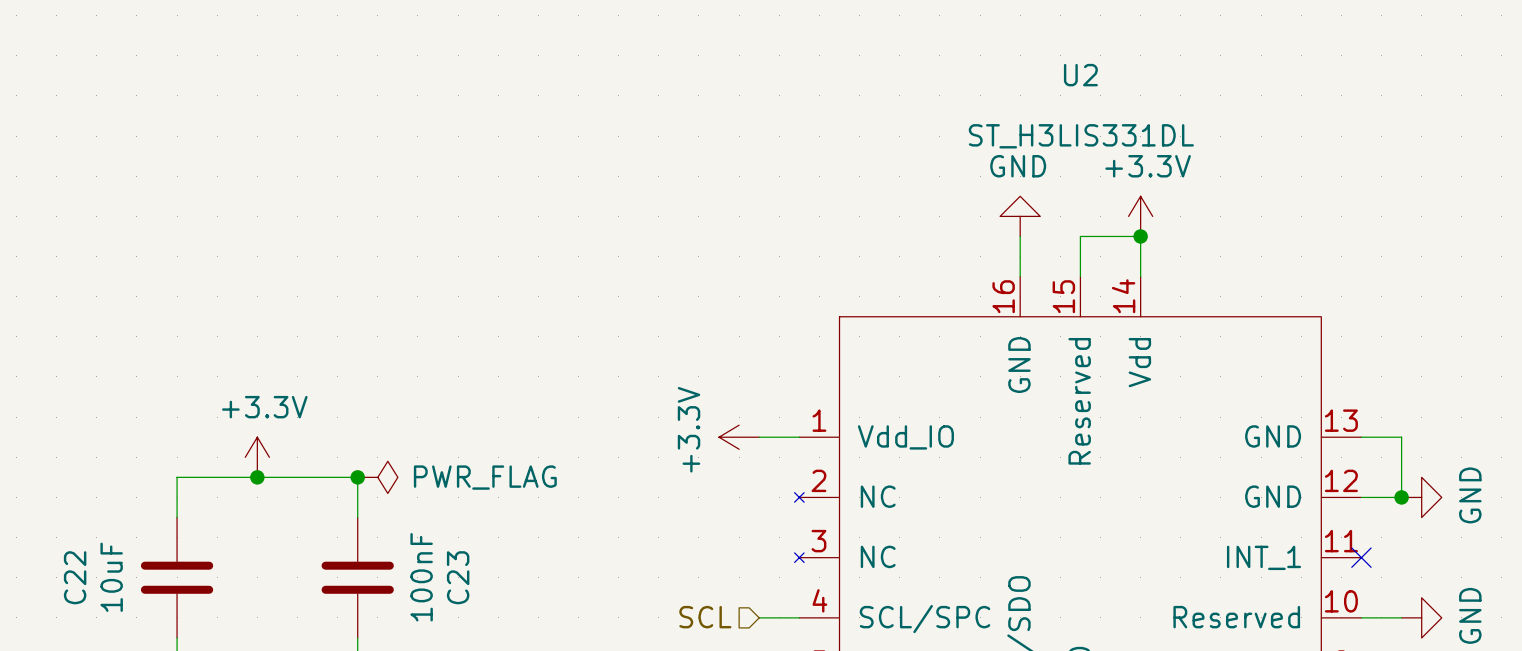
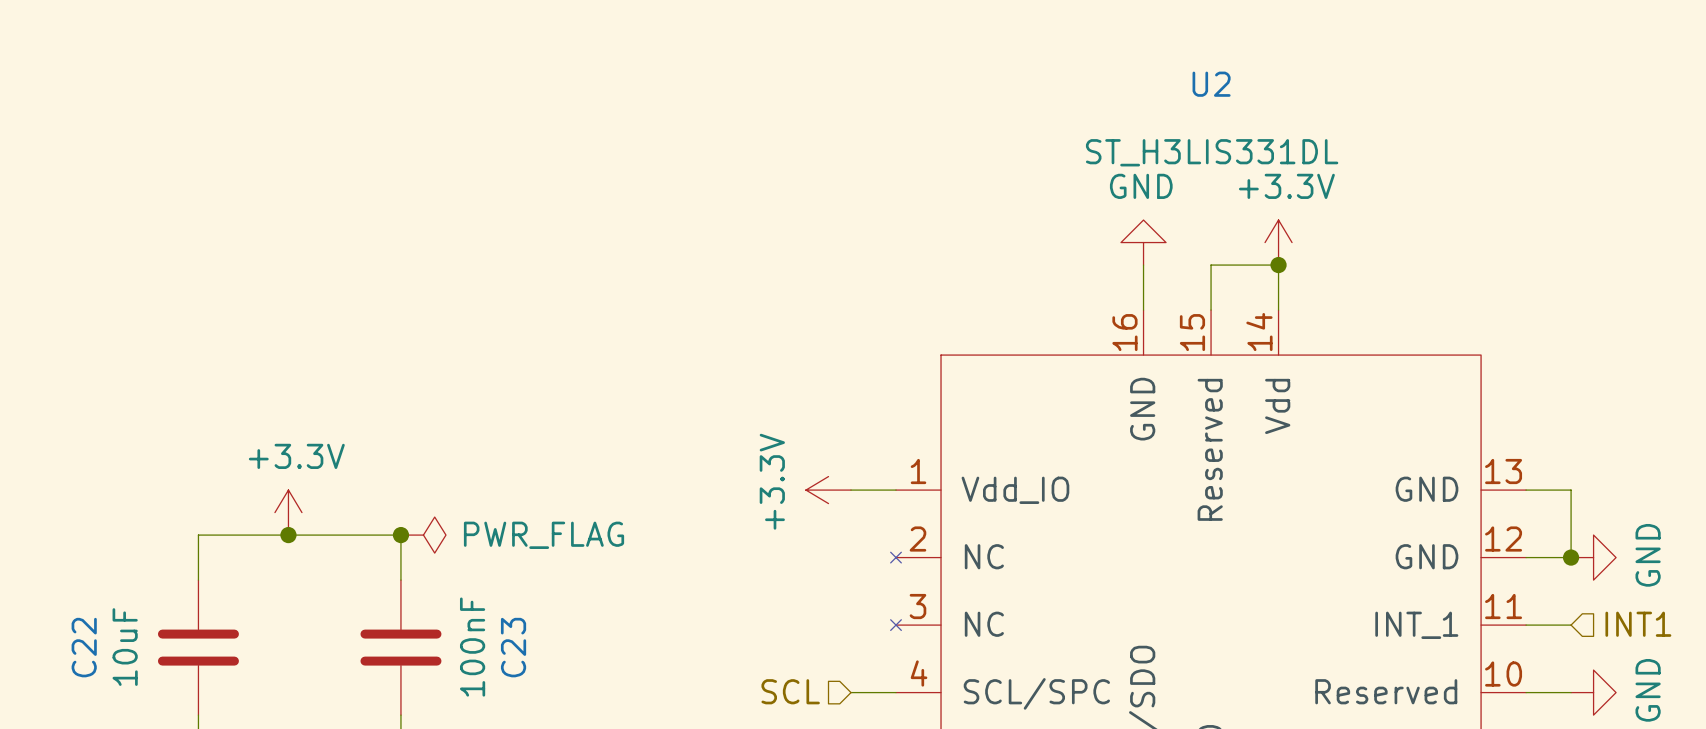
hierarchical label: none -> INT1 (1638, 624)
wire: none -> (1526, 625) (1571, 625)
no-connect mark: (1361, 557) -> none

